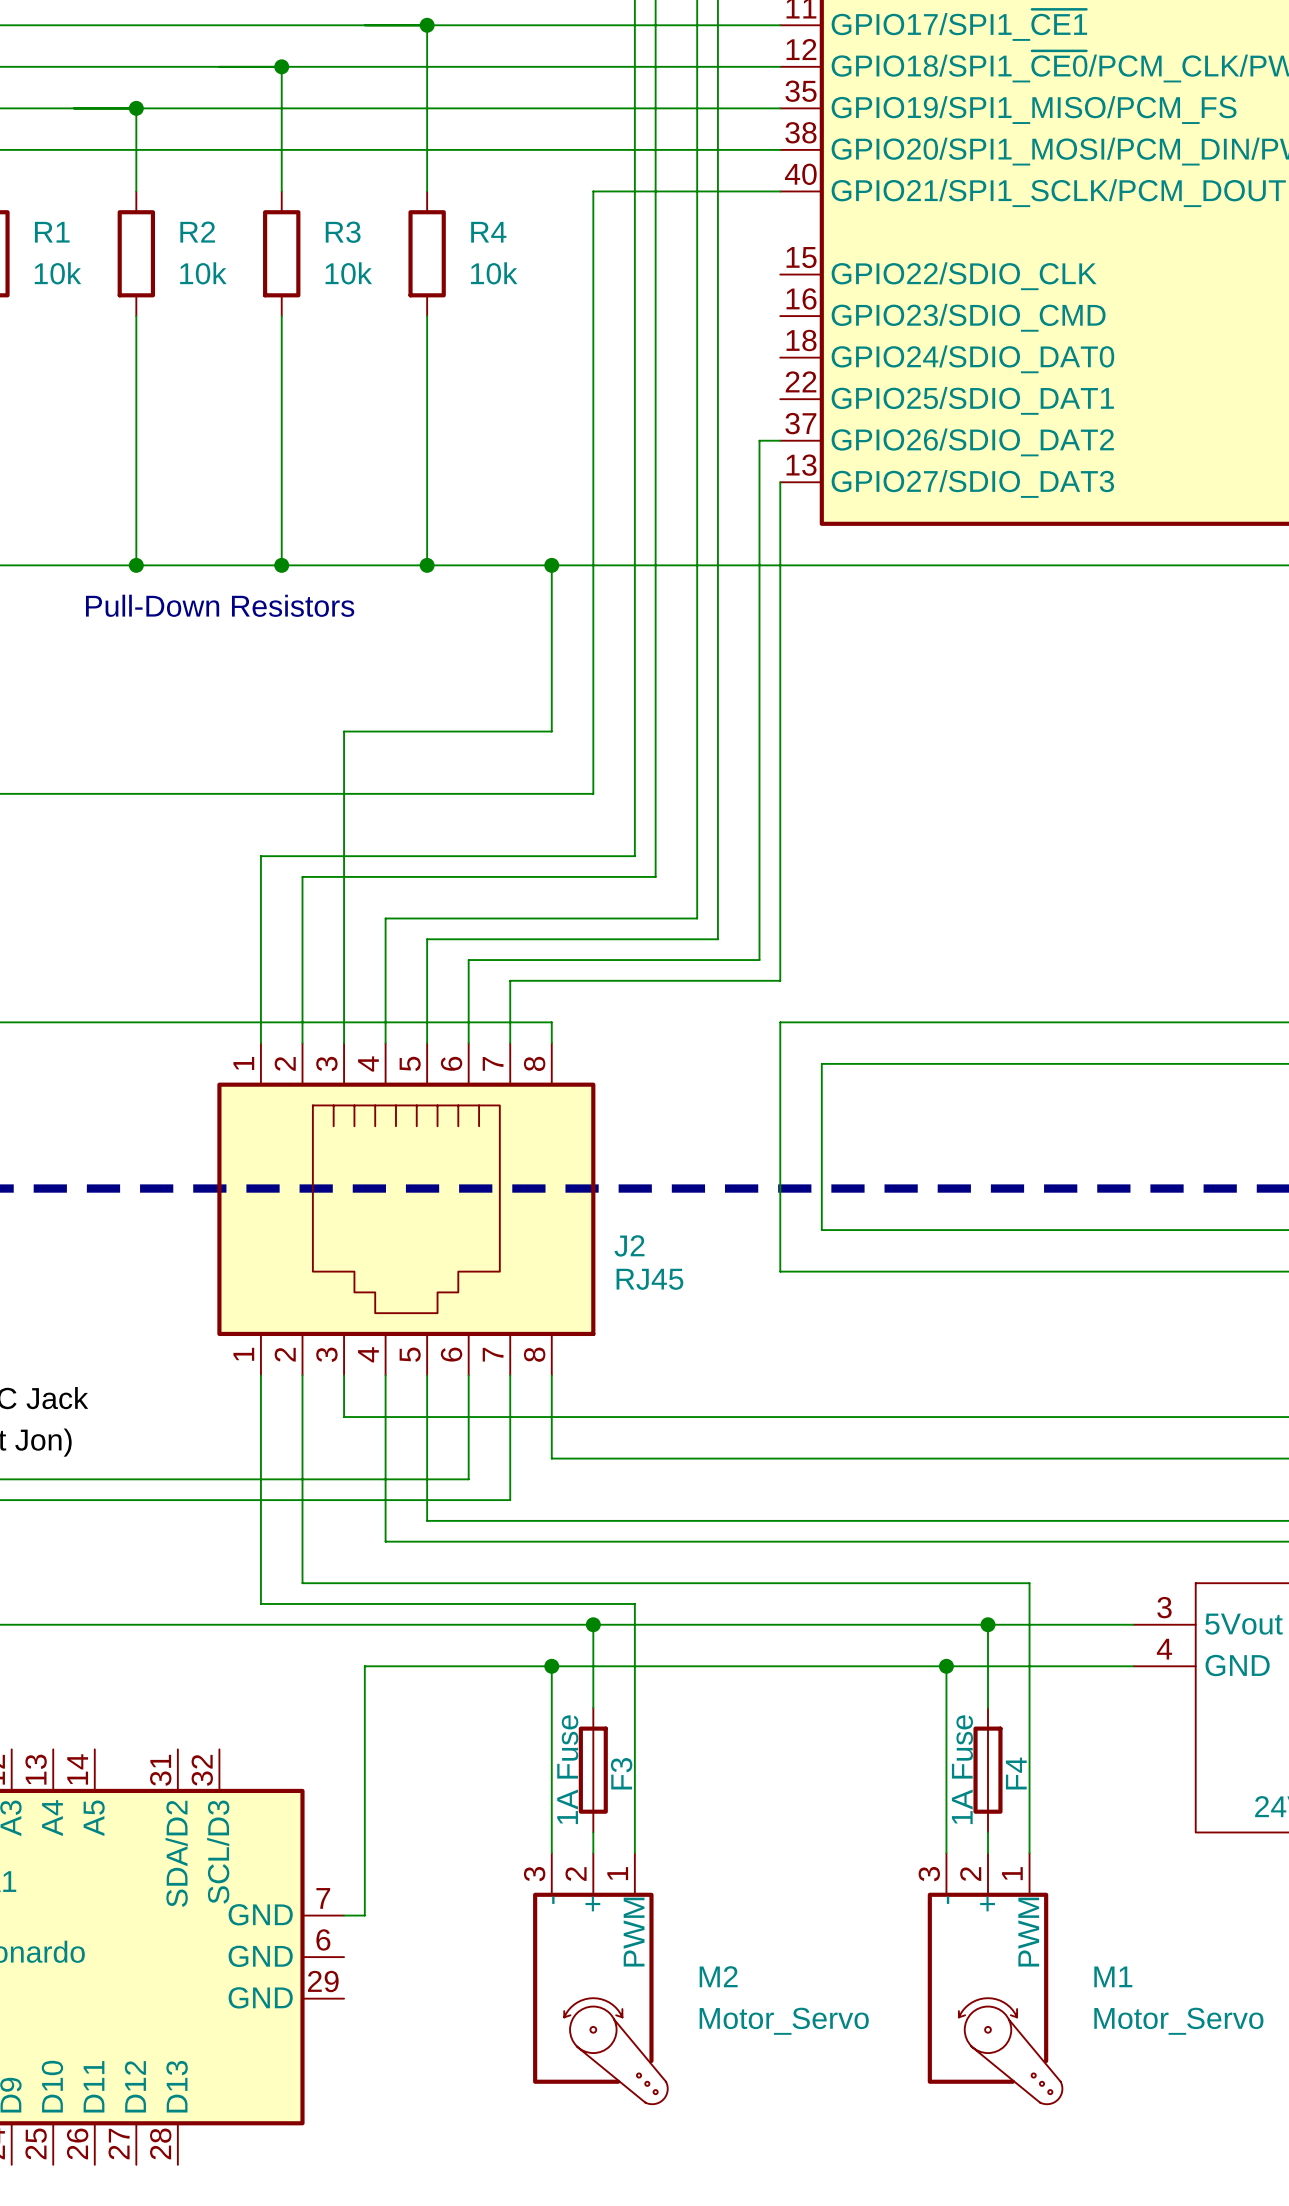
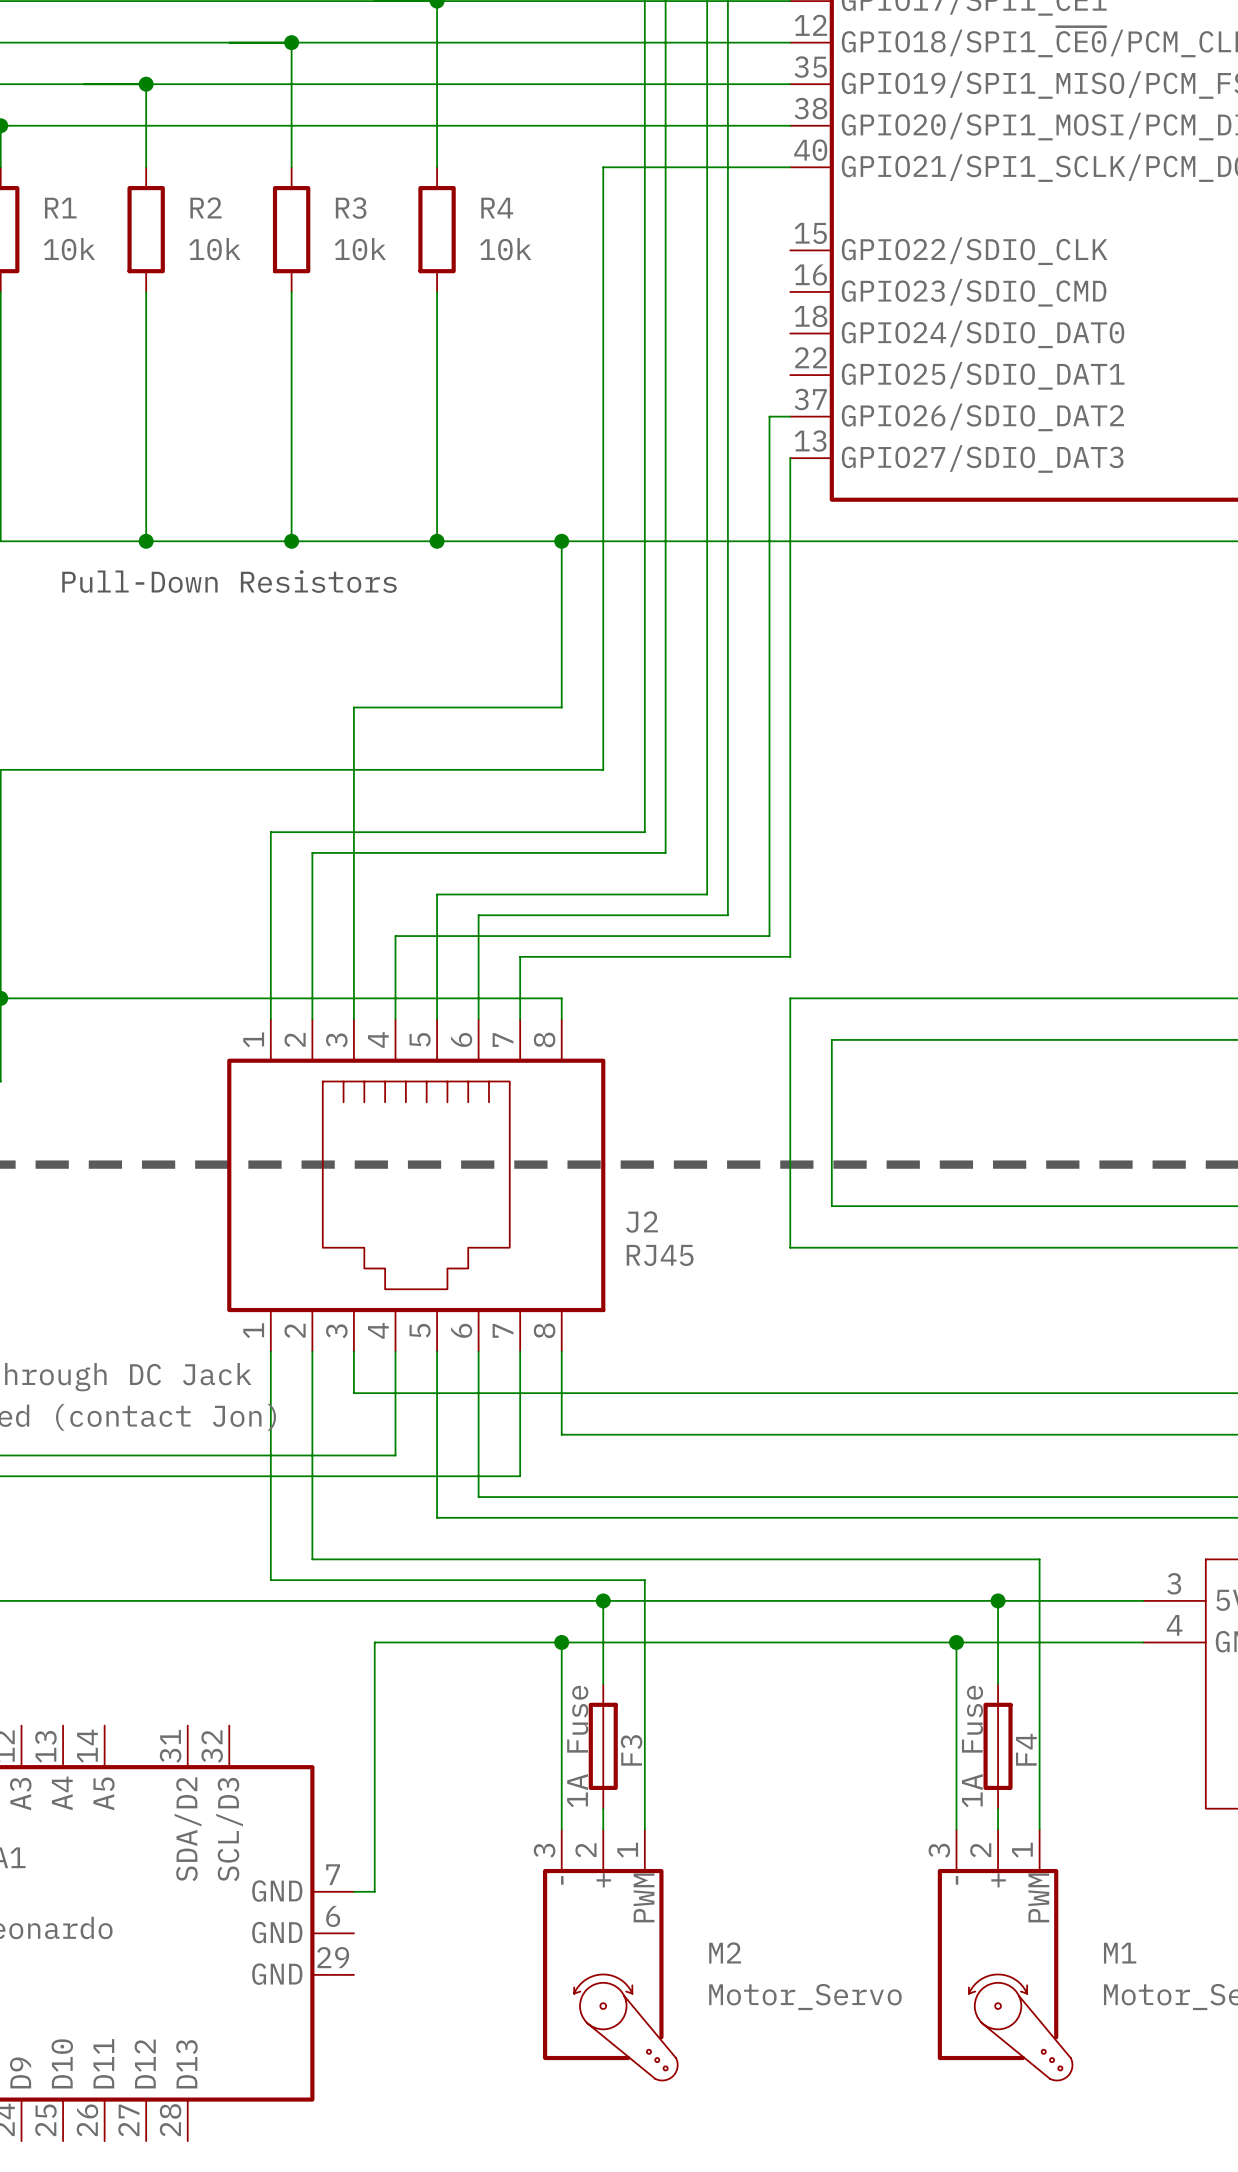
wire: (427, 918) (385, 918) (385, 960) -> (437, 894) (437, 915)
wire: (427, 939) (468, 939) -> (395, 936) (478, 936) (478, 915)
wire: (468, 1479) (385, 1479) (385, 1541) (427, 1541) -> (478, 1455) (478, 1497)
wire: (427, 1520) (468, 1520) -> (437, 1497) (437, 1517)

